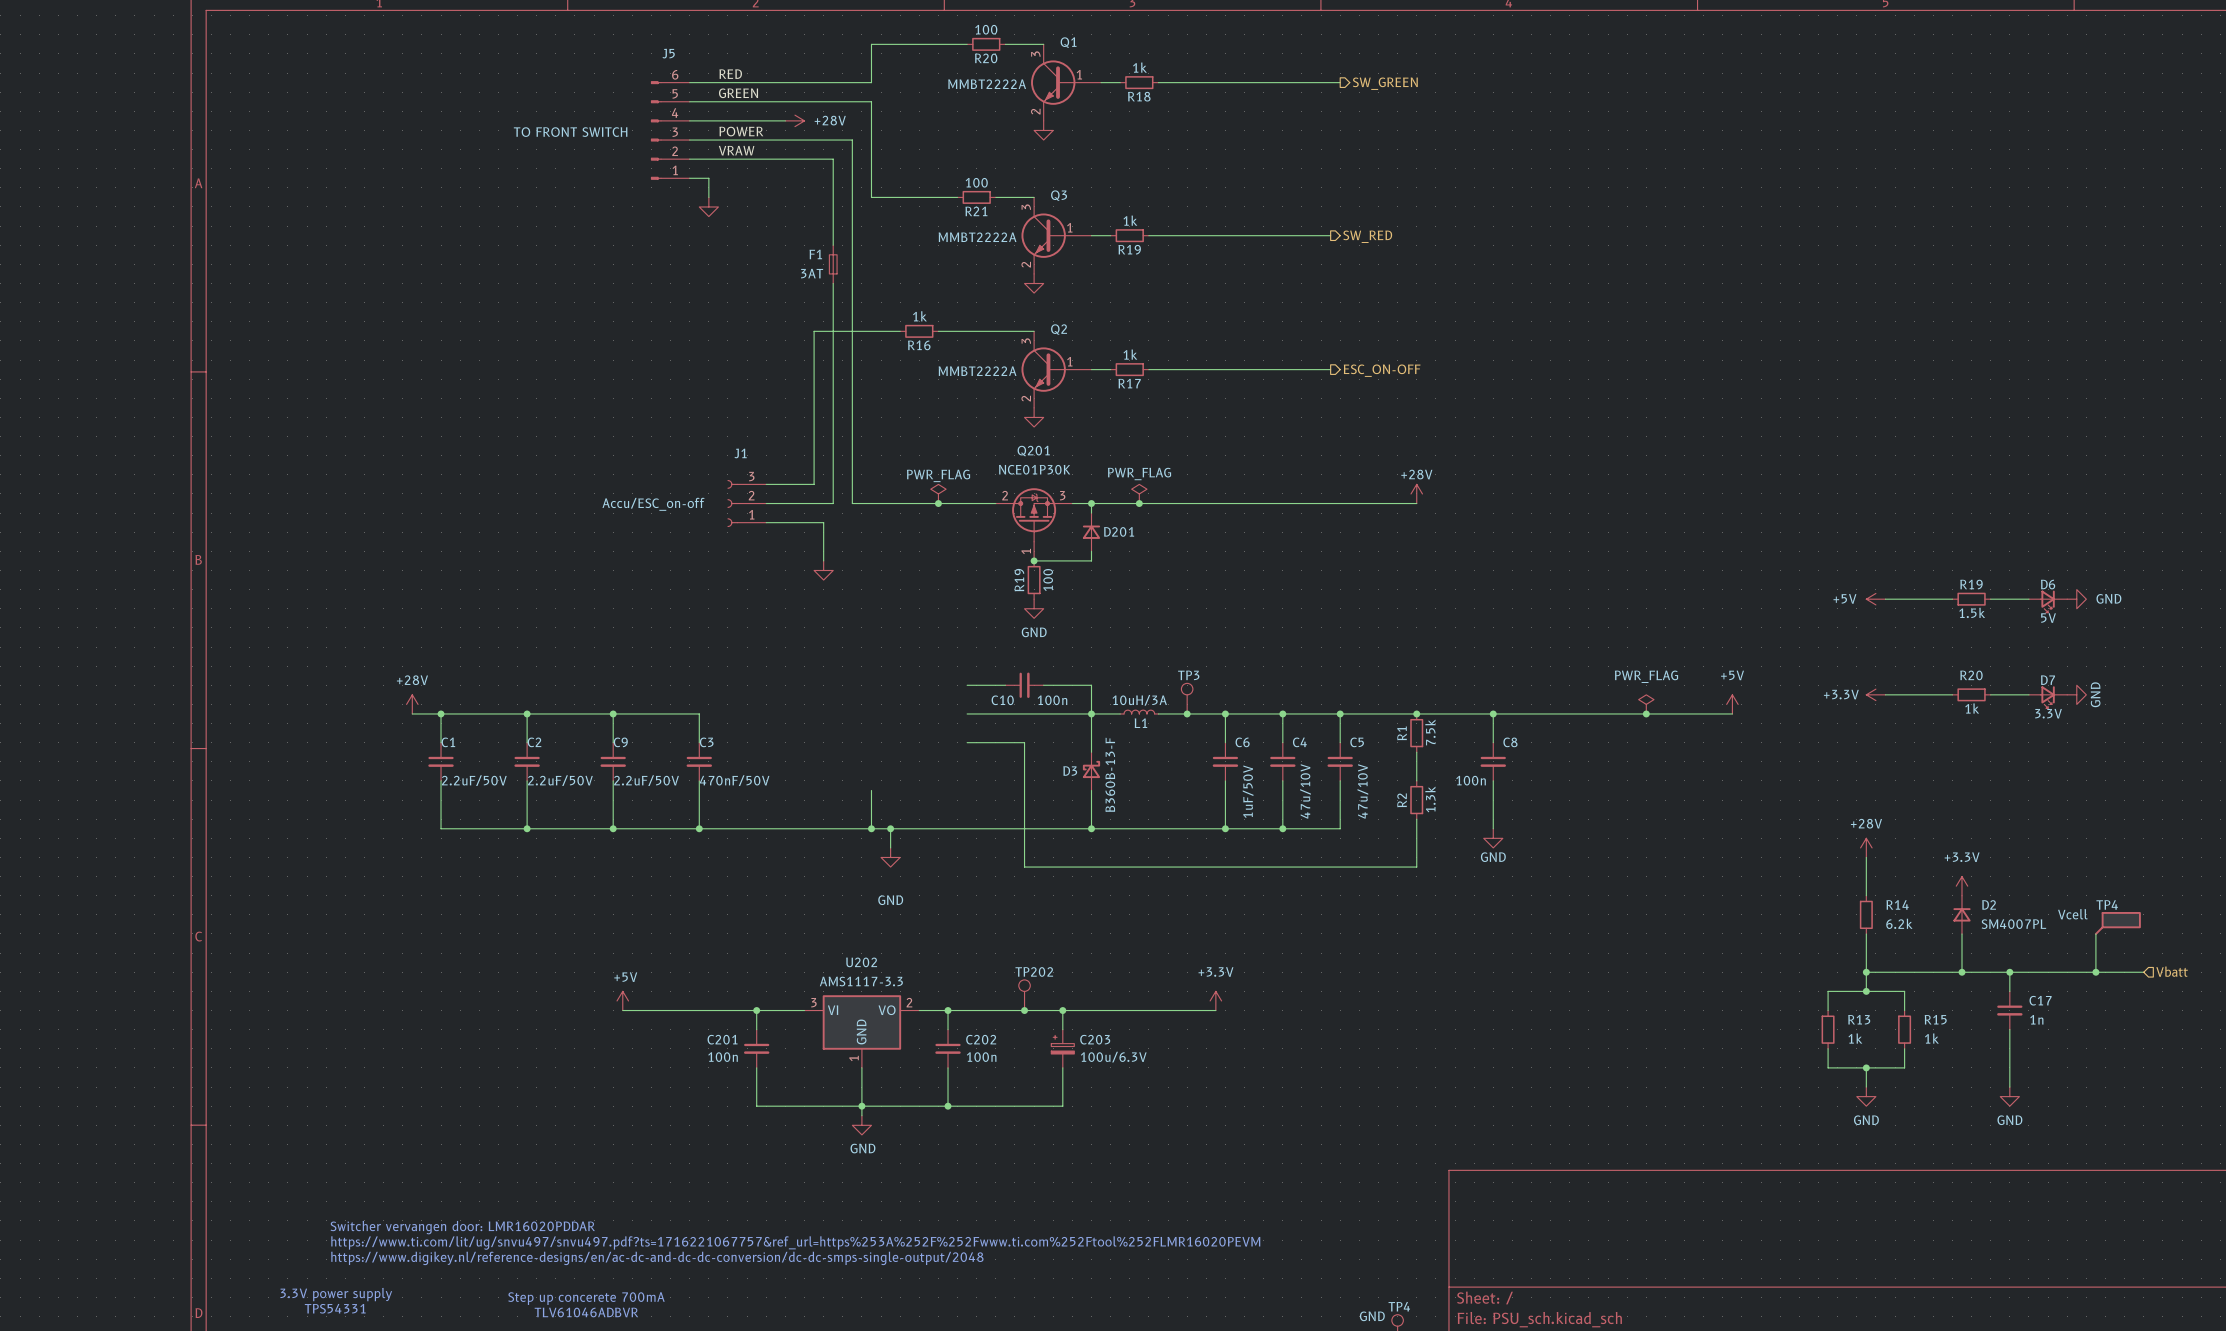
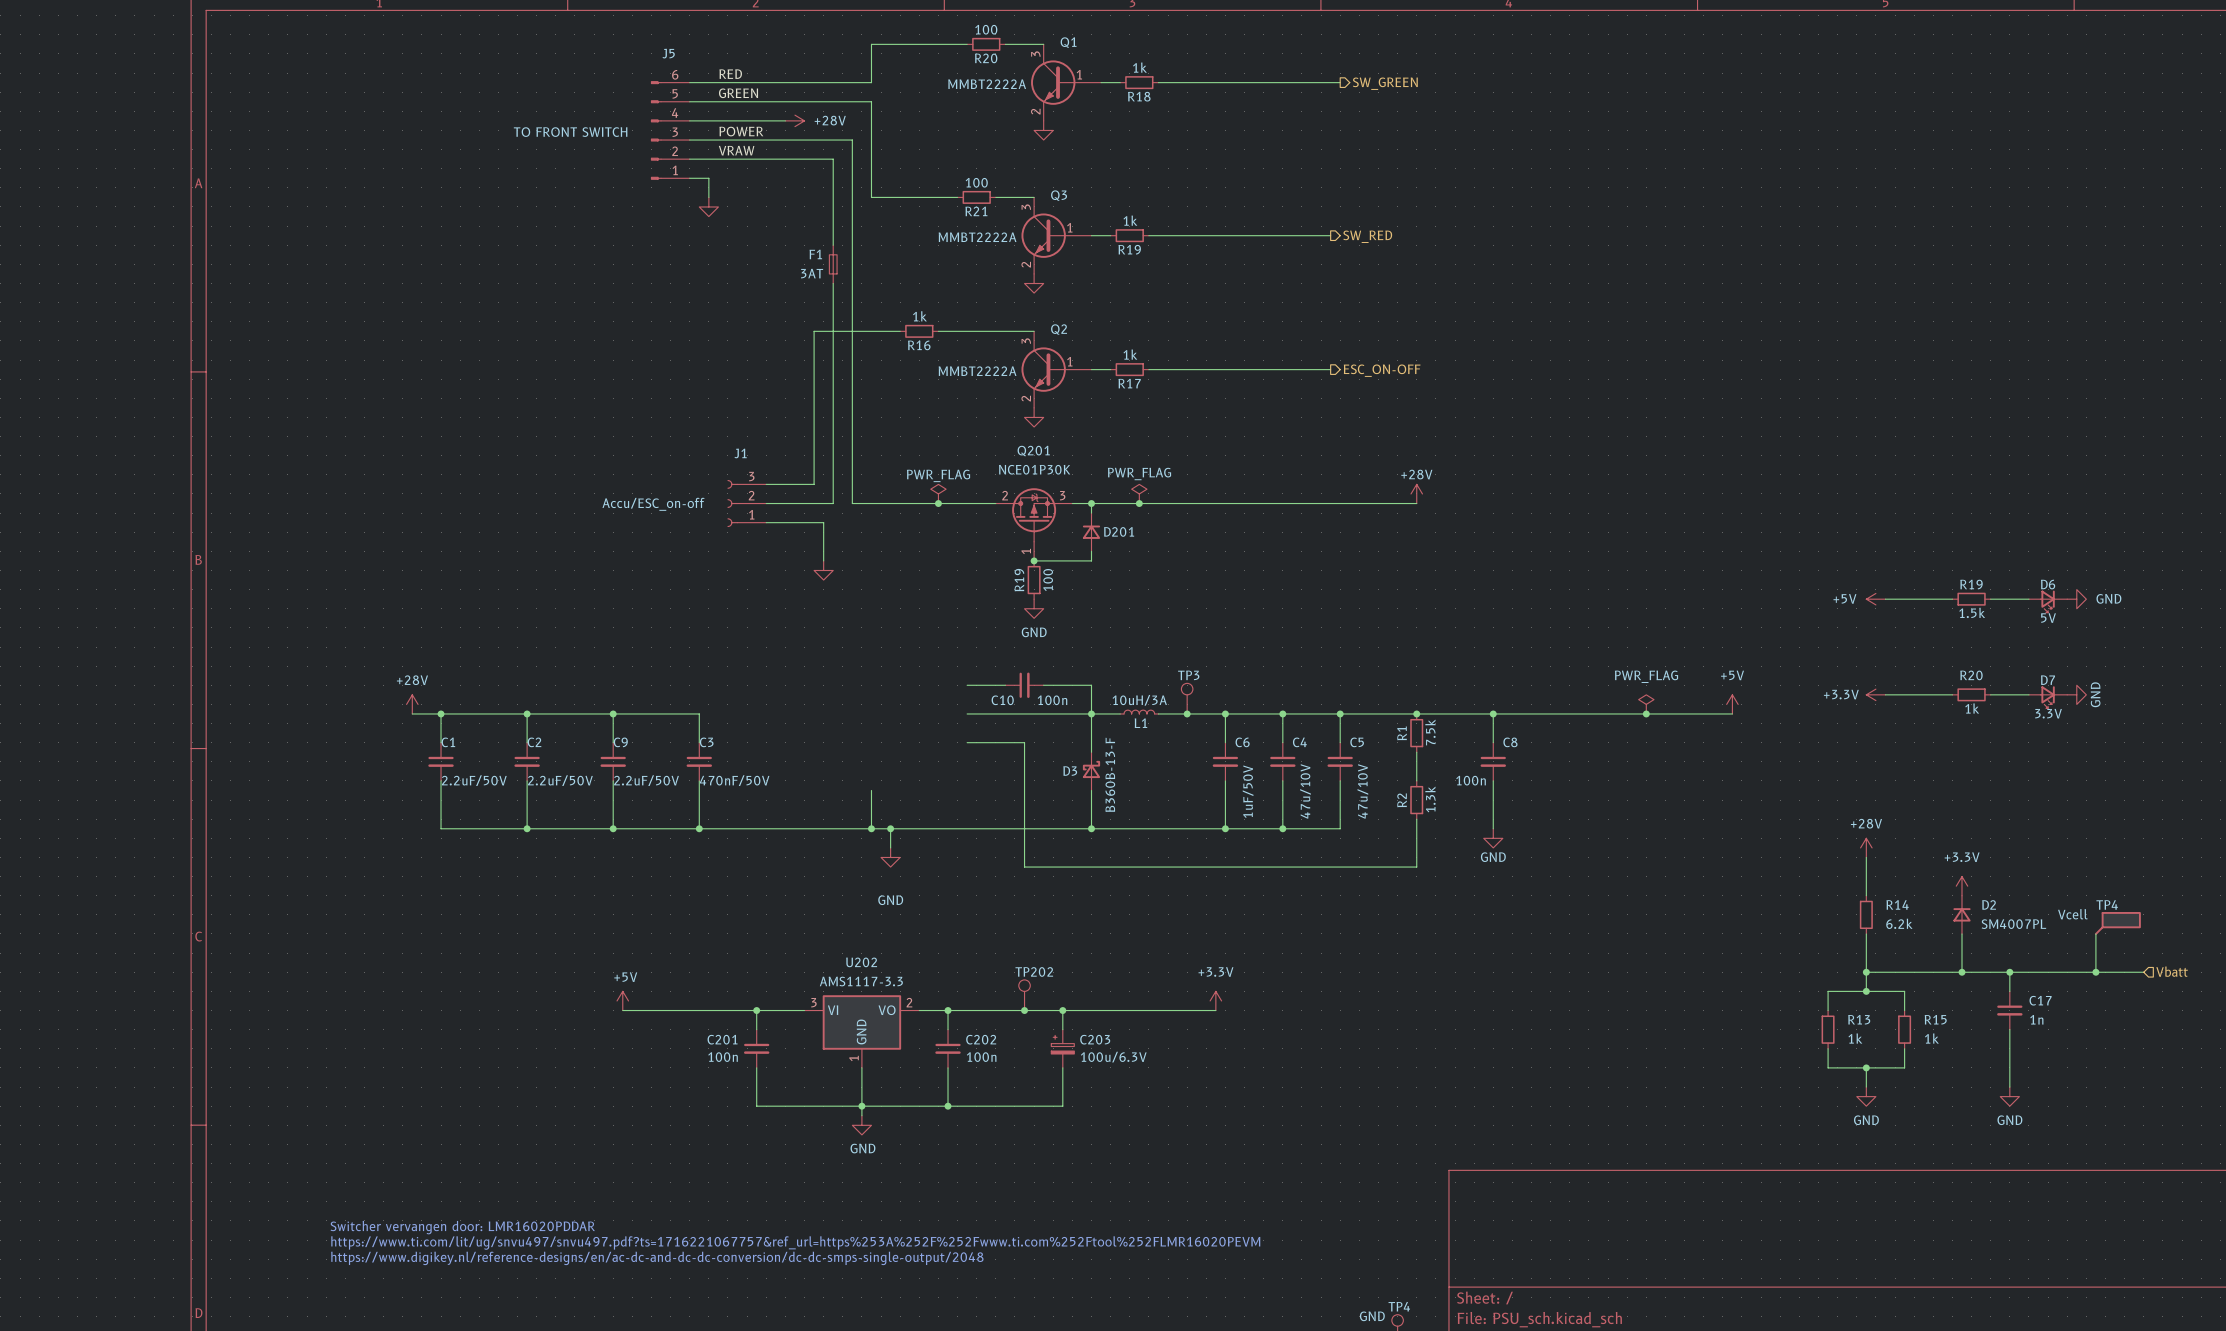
text: 3.3V power supply (336, 1294) -> none
text: Step up concerete 700mA (586, 1298) -> none
text: TPS54331 (335, 1308) -> none
text: TLV61046ADBVR (586, 1312) -> none

